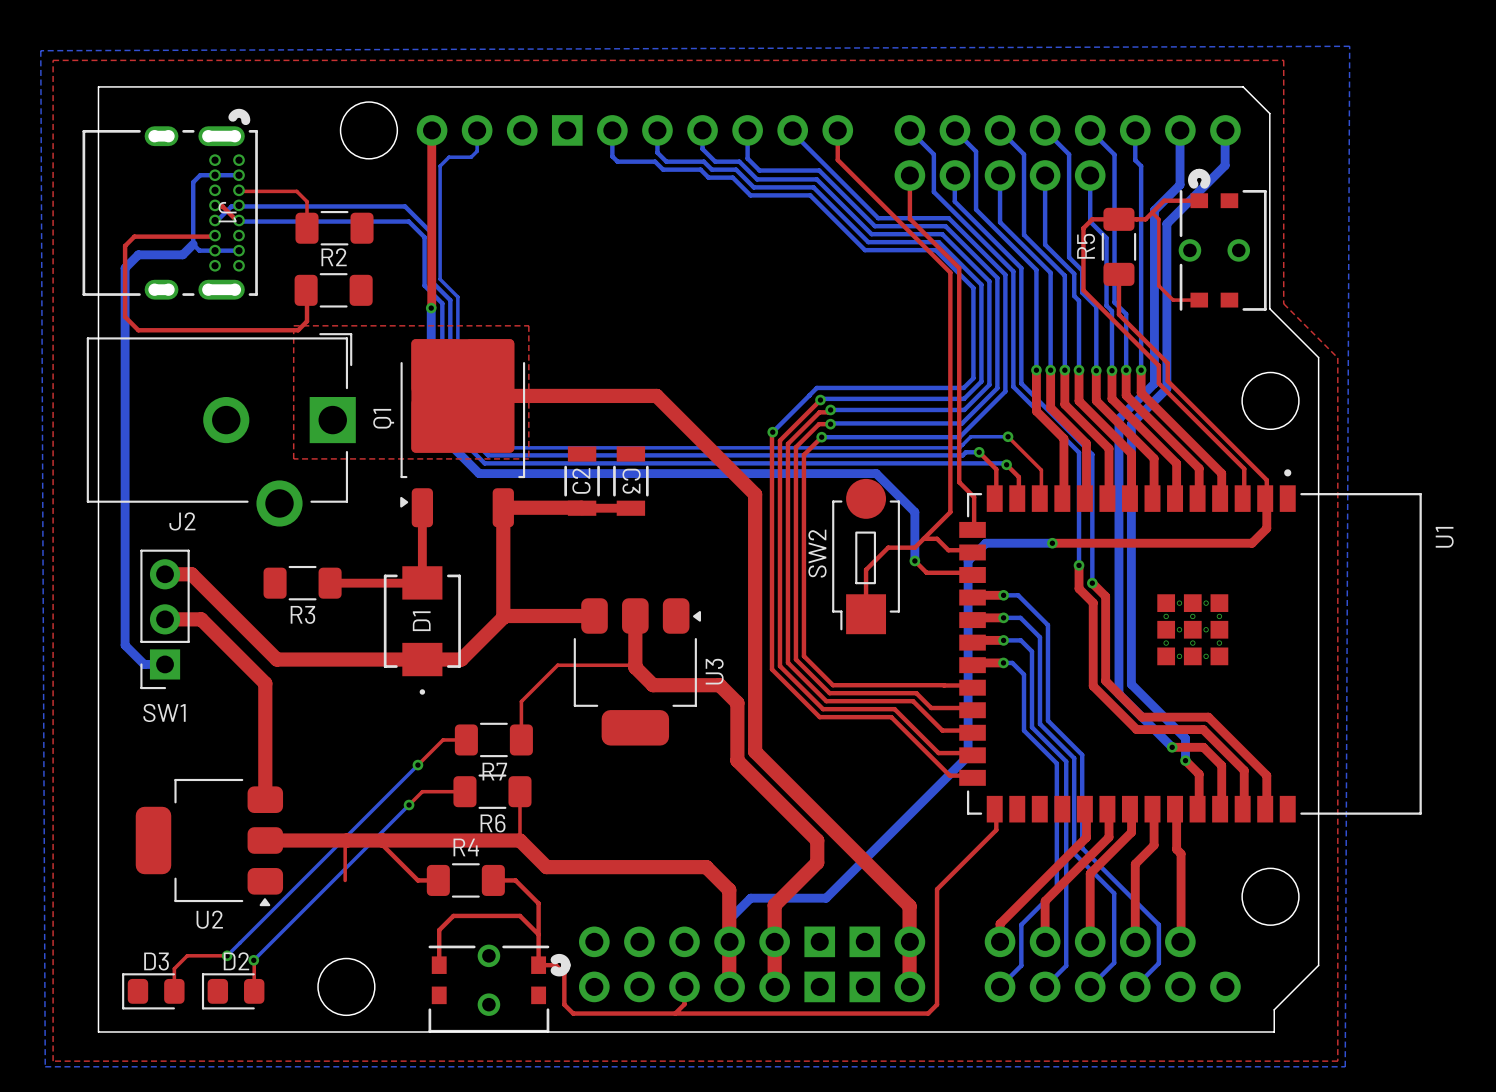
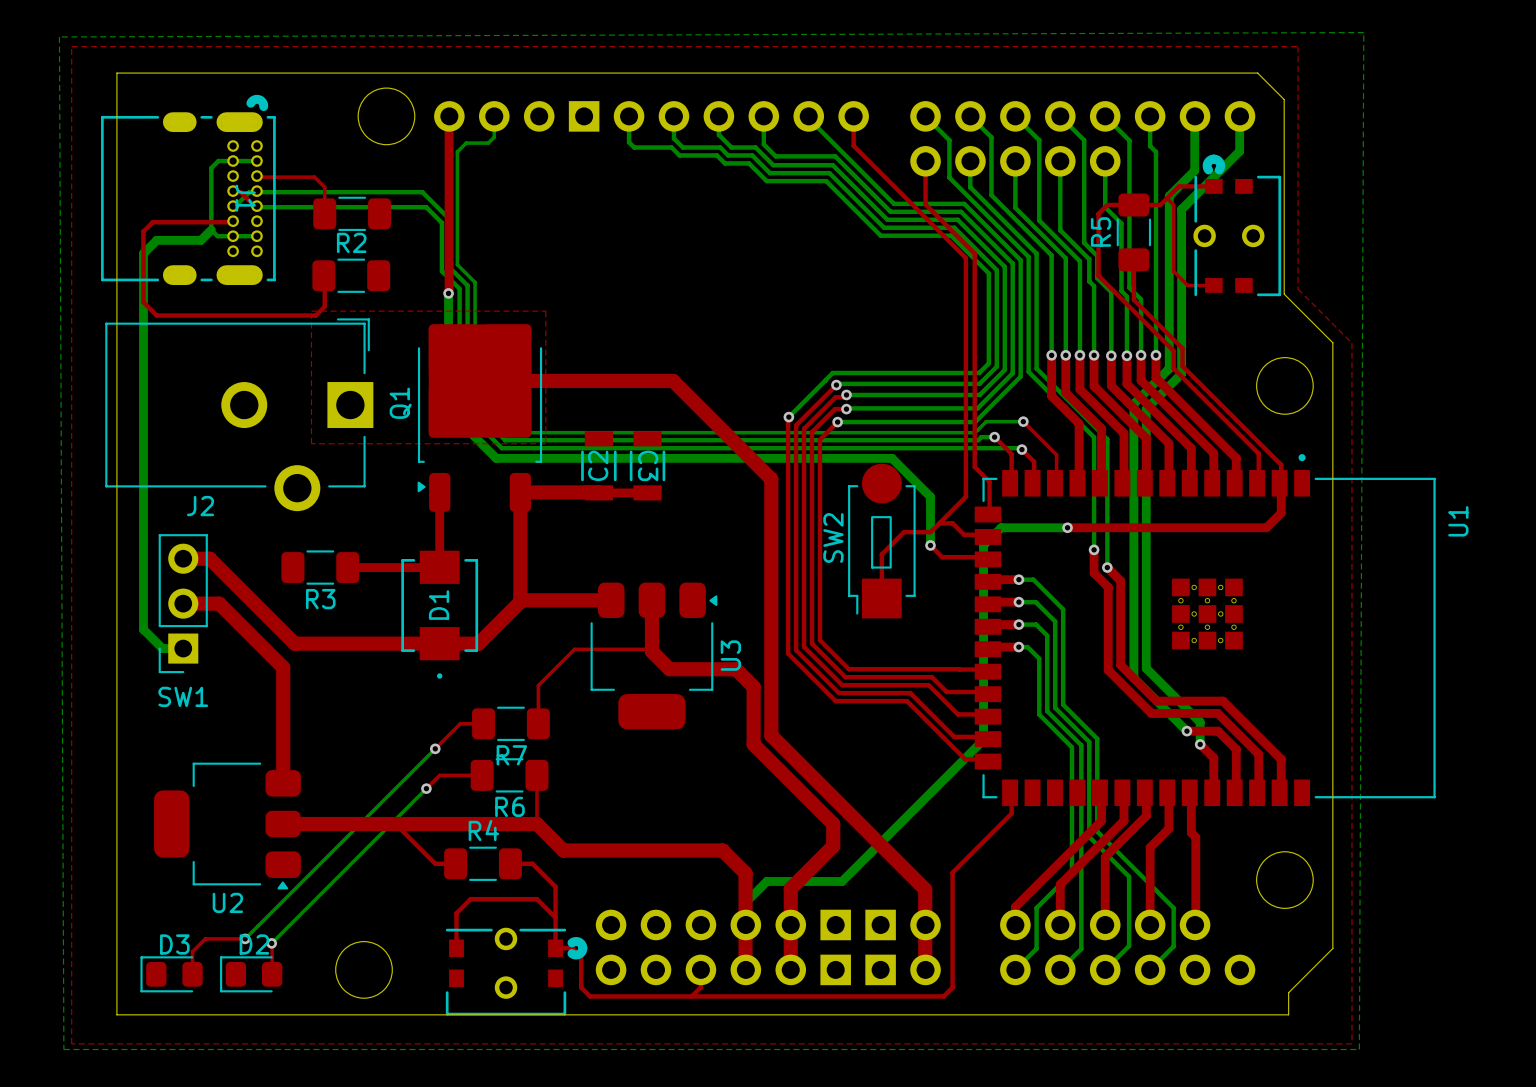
top track: (345, 842) (345, 880) -> none

